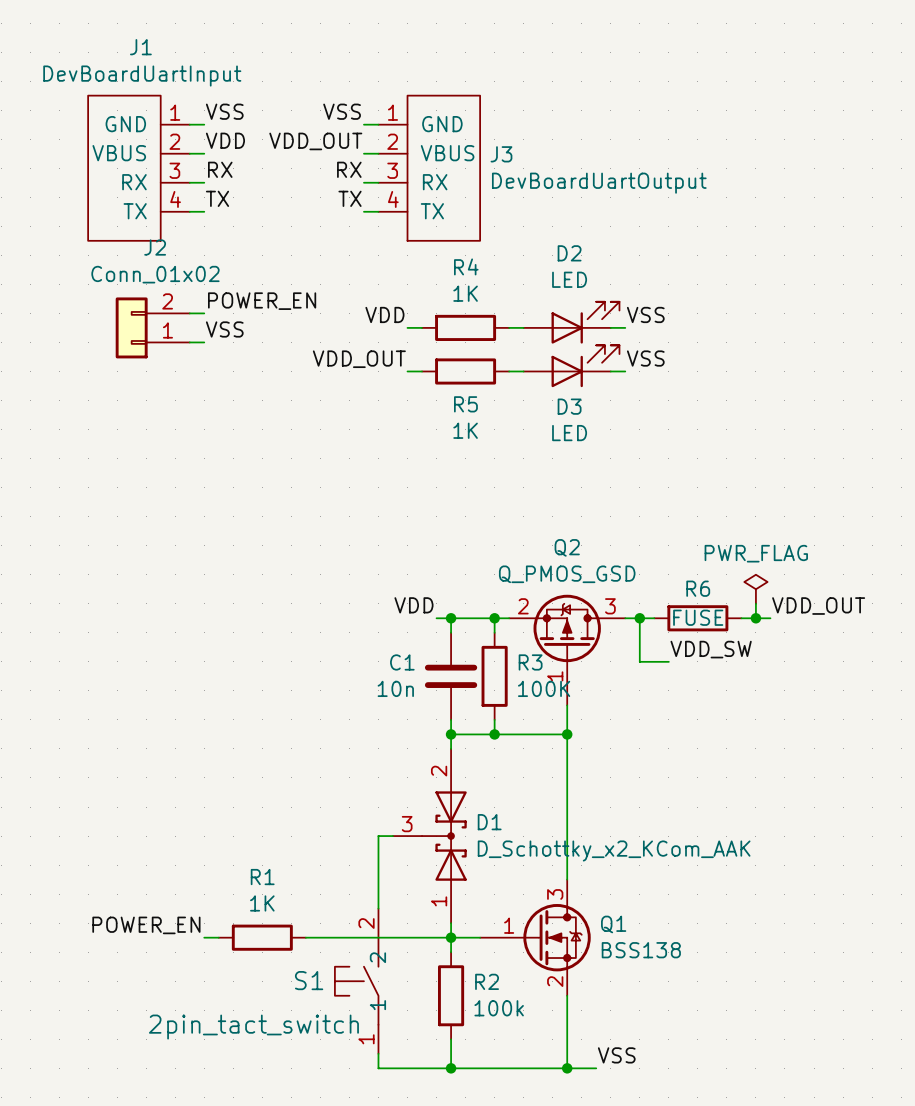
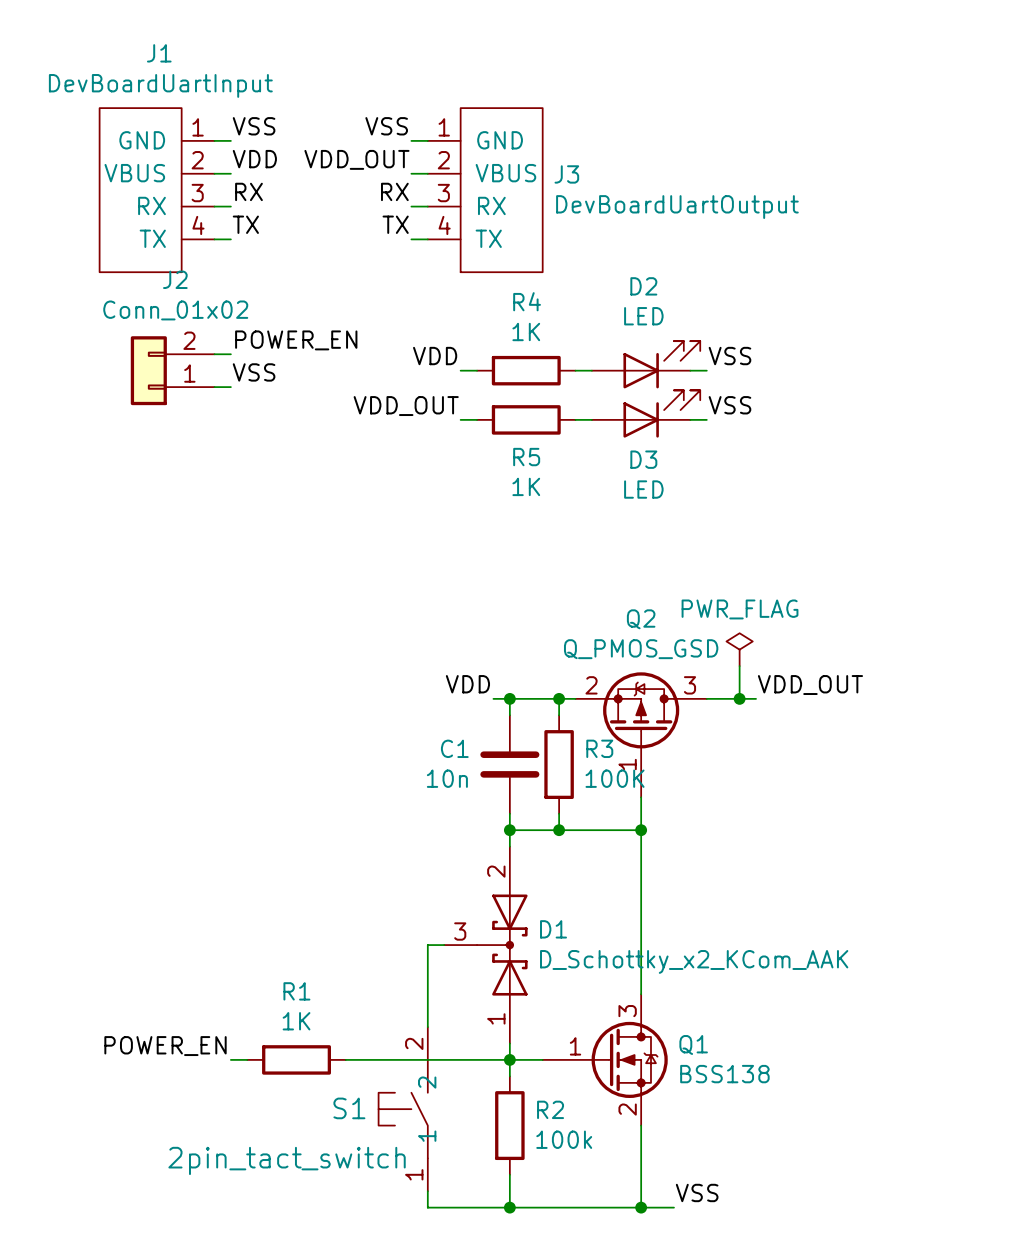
wire: none -> (739, 666) (739, 698) (756, 698)
power symbol position: PWR_FLAG (755, 589) -> PWR_FLAG (739, 649)
wire: (755, 603) (755, 618) -> none
label position: VDD_OUT (818, 606) -> VDD_OUT (810, 685)
wire: (639, 618) (639, 661) (668, 661) -> none
junction position: (639, 618) -> (739, 698)
R6: FUSE (697, 618) -> none
wire: (741, 618) (770, 618) -> none
junction: (755, 618) -> none
label: VDD_SW (711, 649) -> none

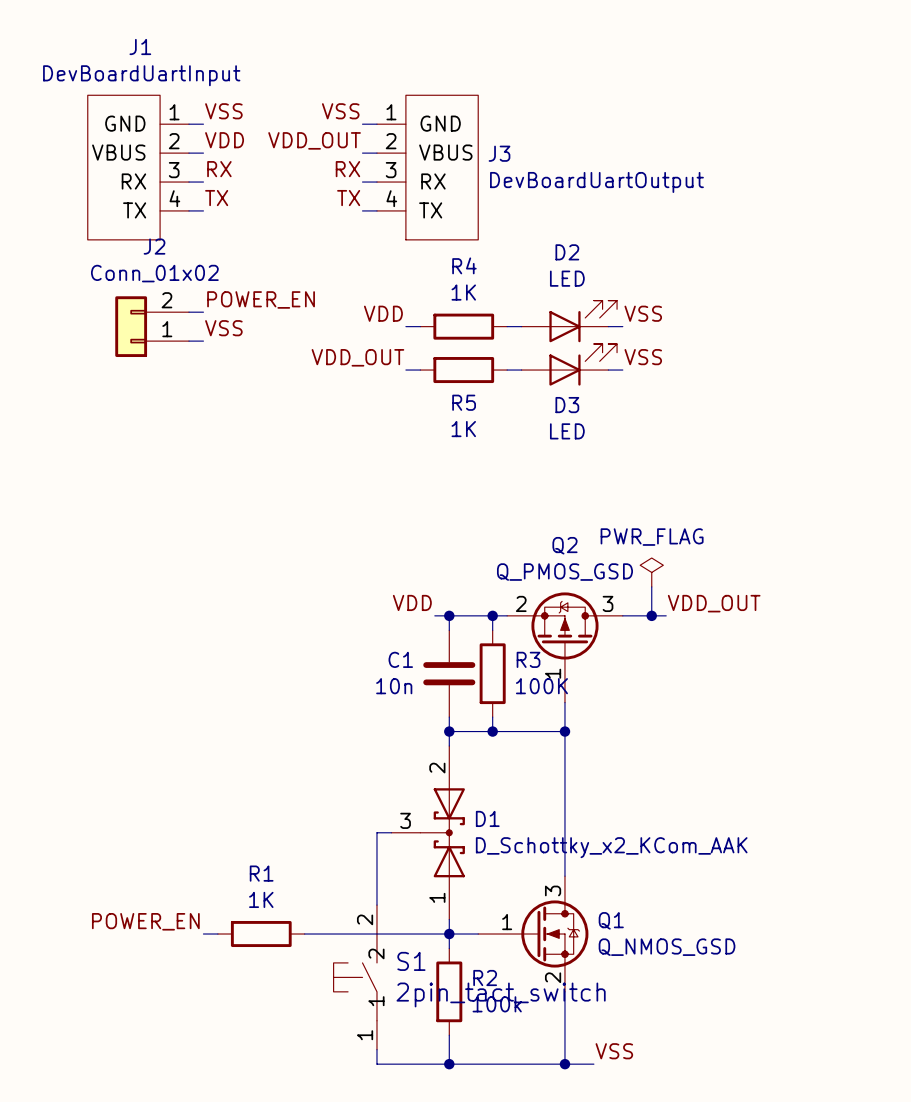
Q1 value: BSS138 (724, 1074) -> Q_NMOS_GSD (667, 947)
S1 name position: S1 (349, 1108) -> S1 (411, 961)
S1 value position: 2pin_tact_switch (287, 1160) -> 2pin_tact_switch (501, 994)

